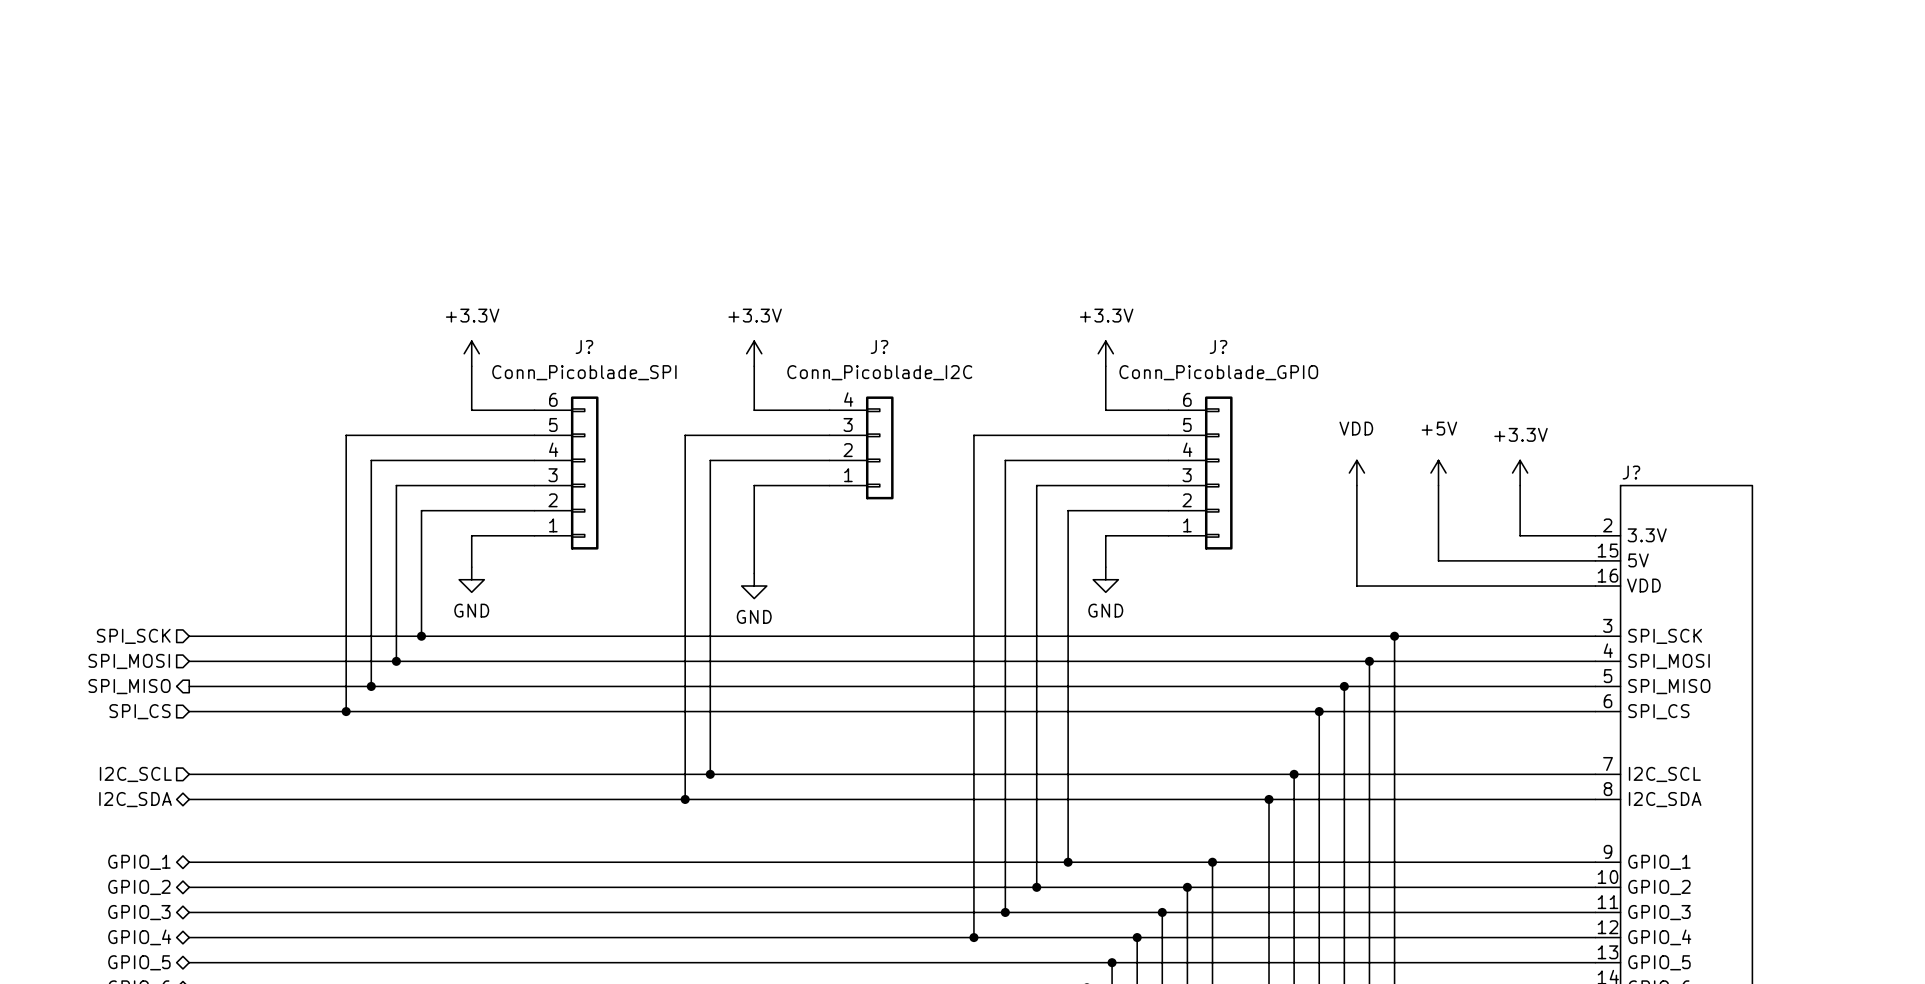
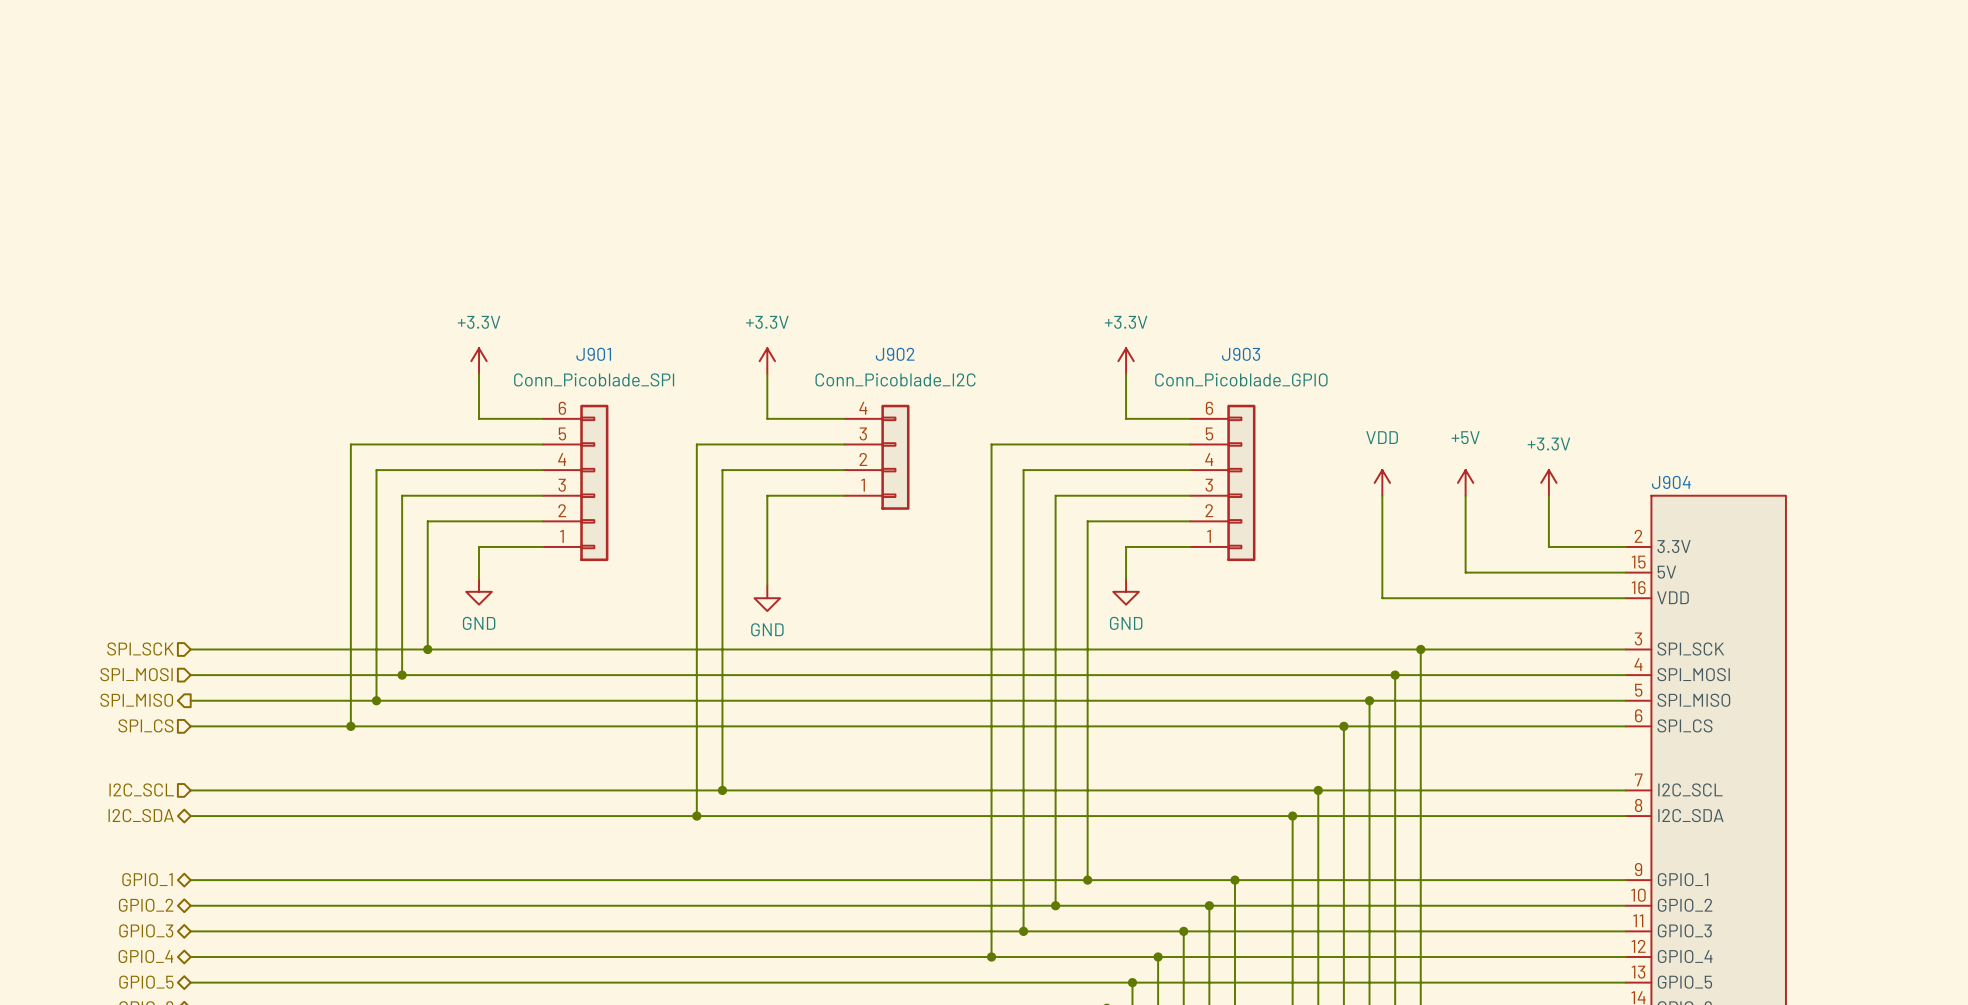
J? name: J? (584, 346) -> J901 (593, 354)
J? name: J? (879, 346) -> J902 (895, 354)
J? name: J? (1218, 346) -> J903 (1241, 354)
J? name: J? (1631, 472) -> J904 (1671, 482)

